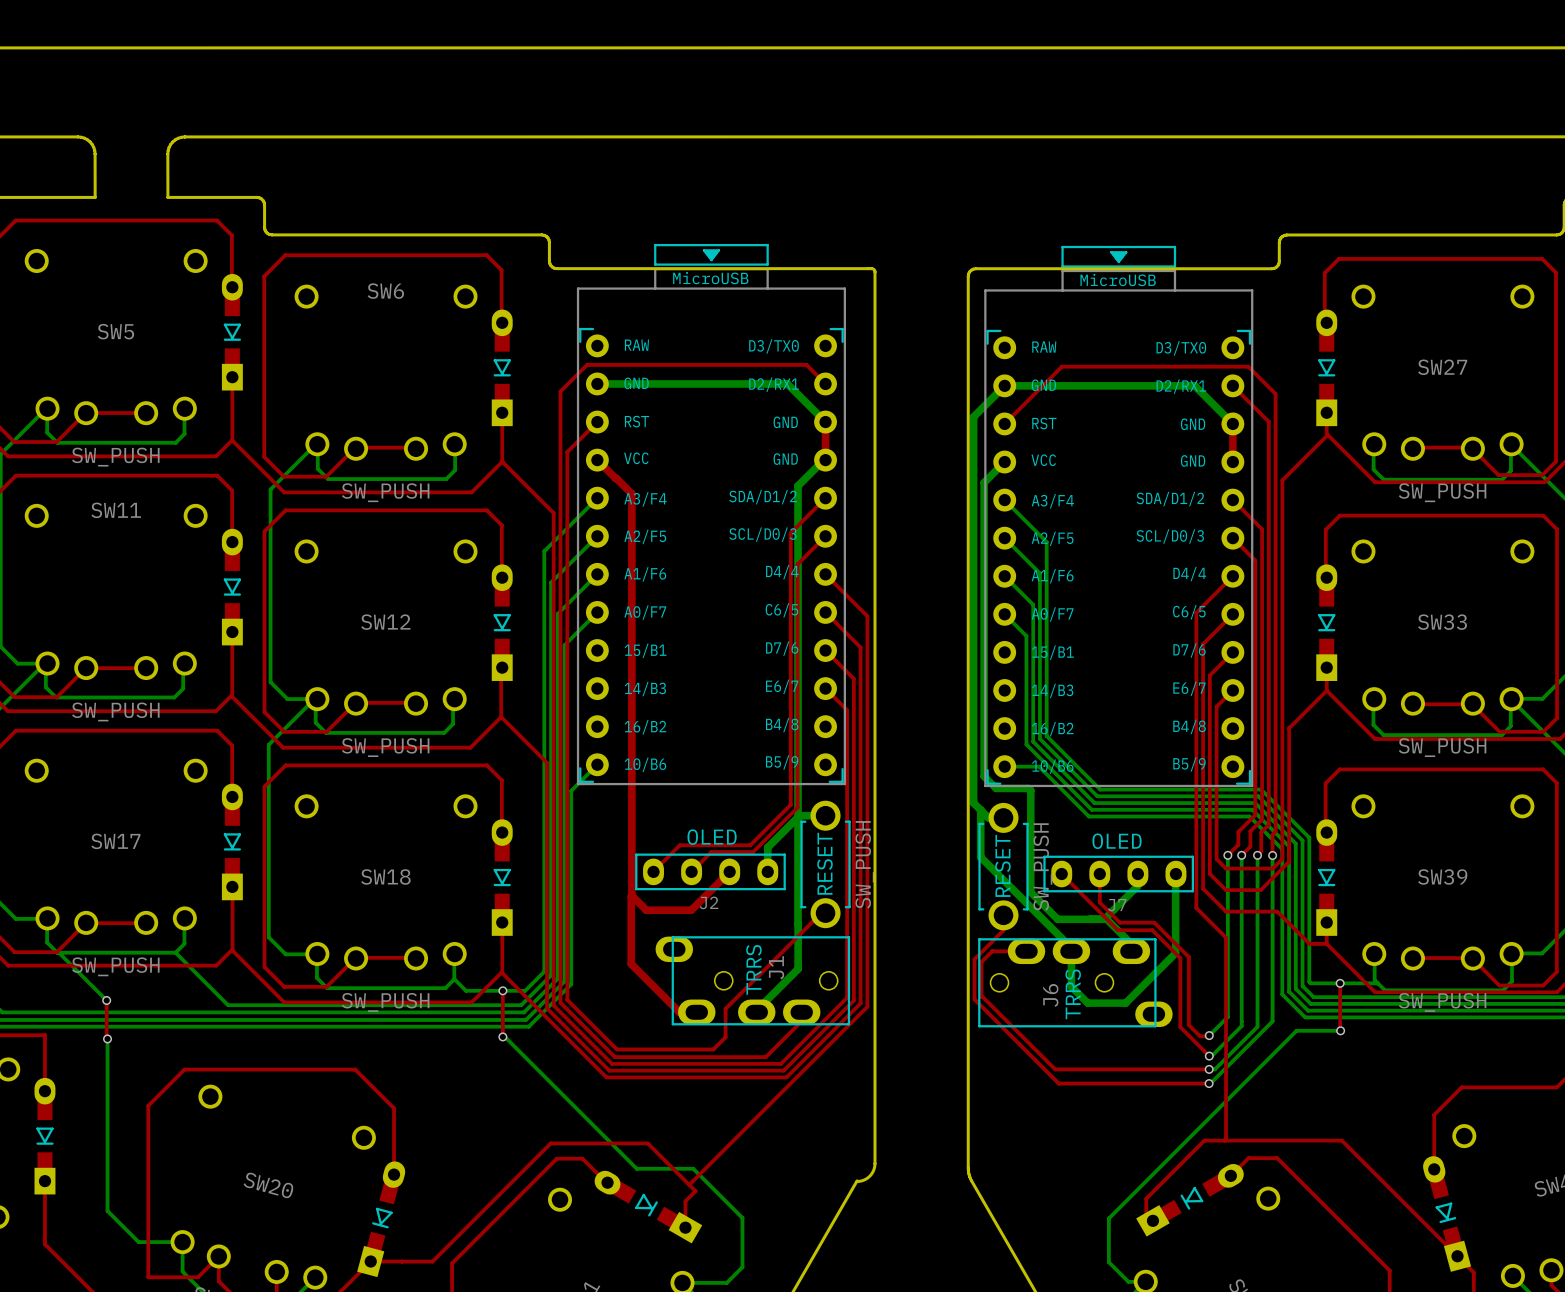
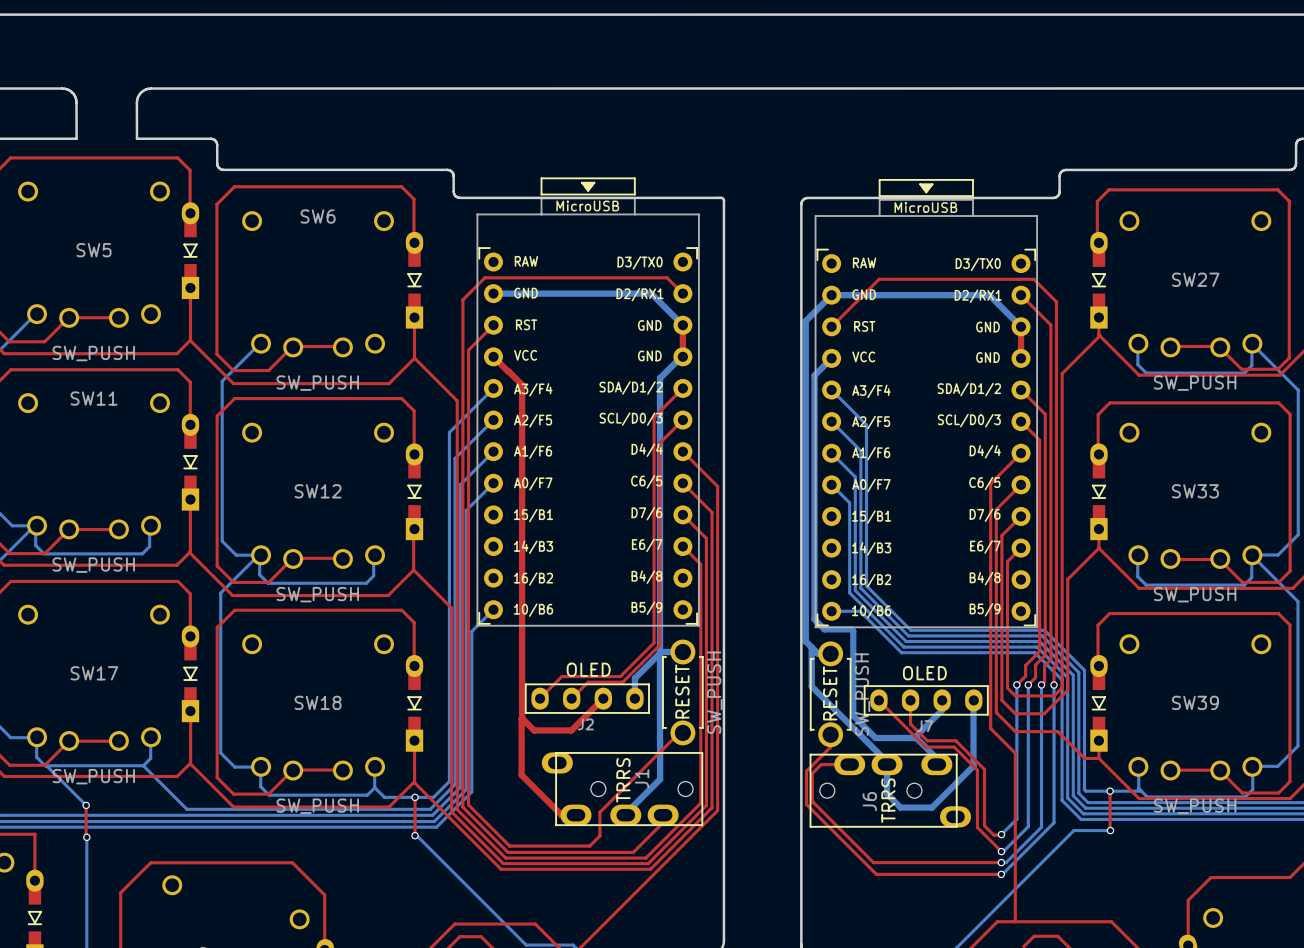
bottom track: (47, 409) (47, 432) (57, 442) (175, 442) (184, 433) -> none
bottom track: (184, 409) (184, 433) -> none
bottom track: (317, 445) (317, 468) (328, 479) (446, 479) (455, 470) -> none
bottom track: (455, 445) (455, 469) -> none

